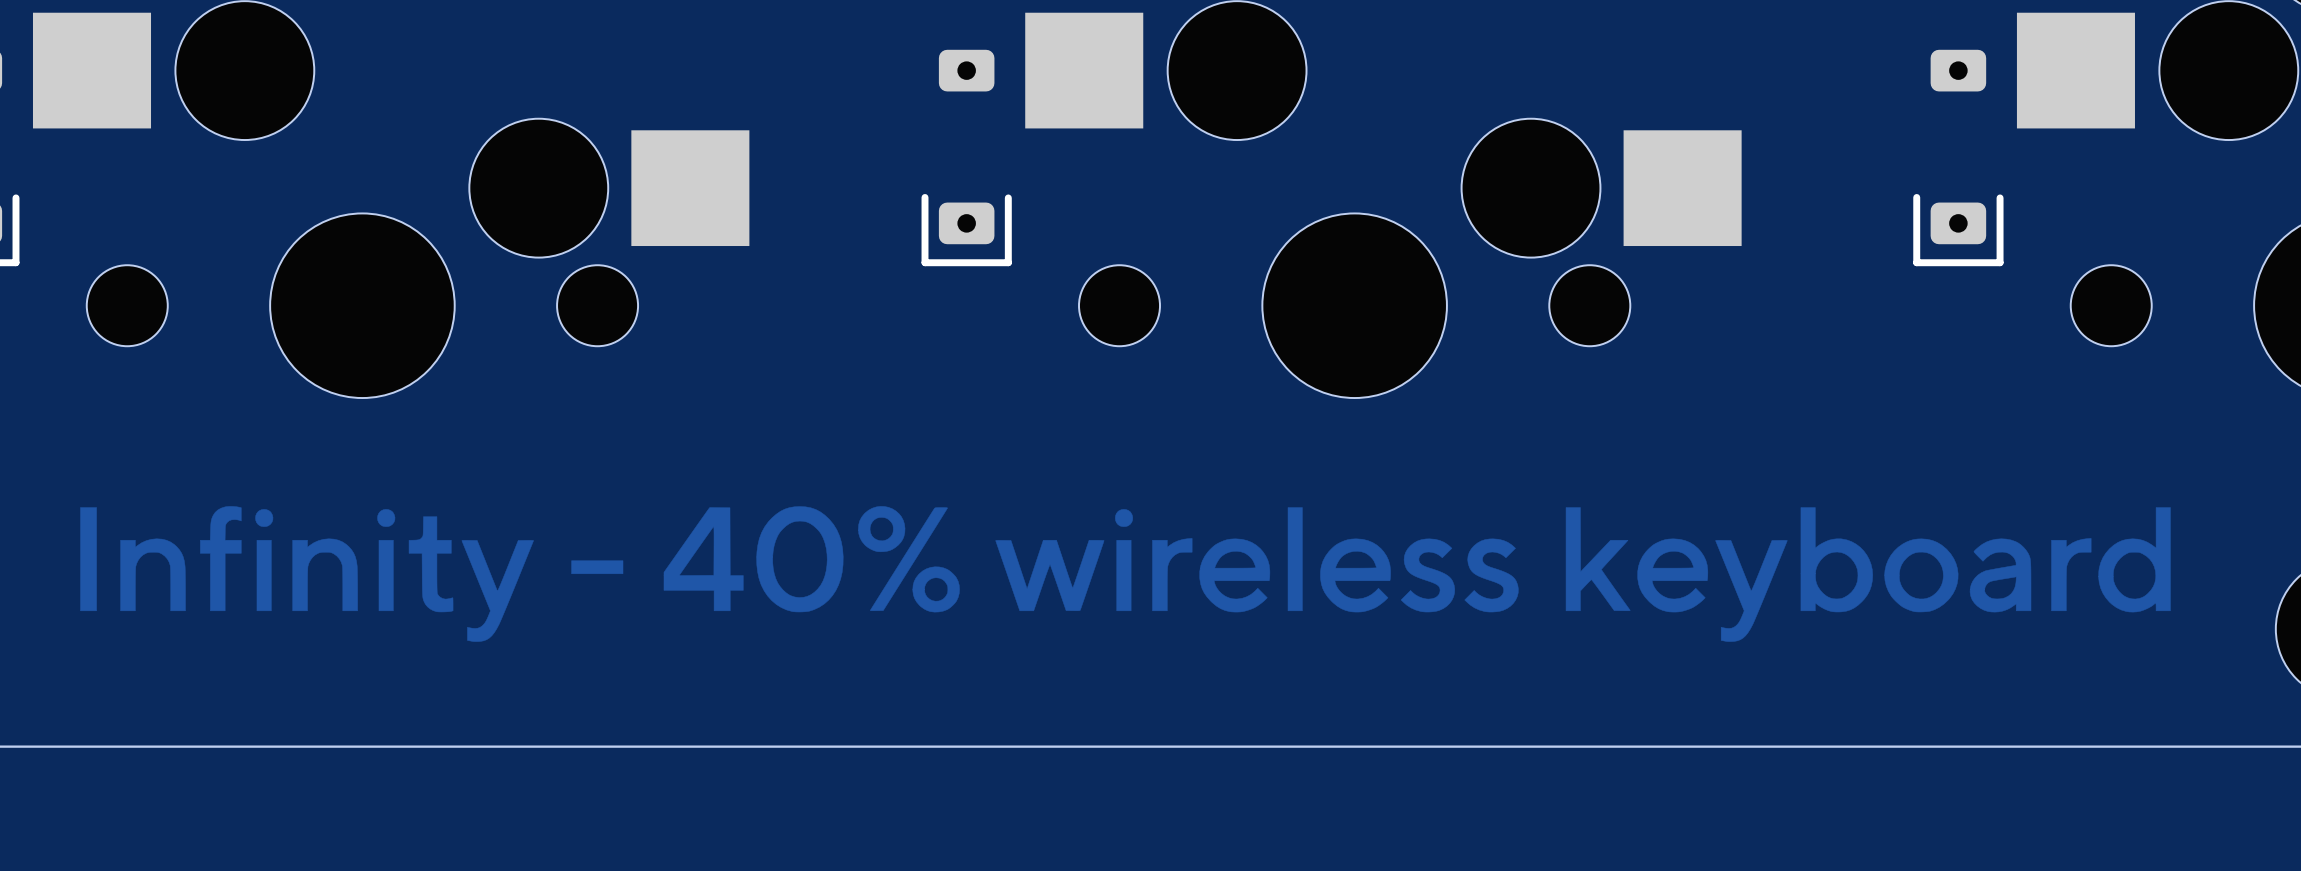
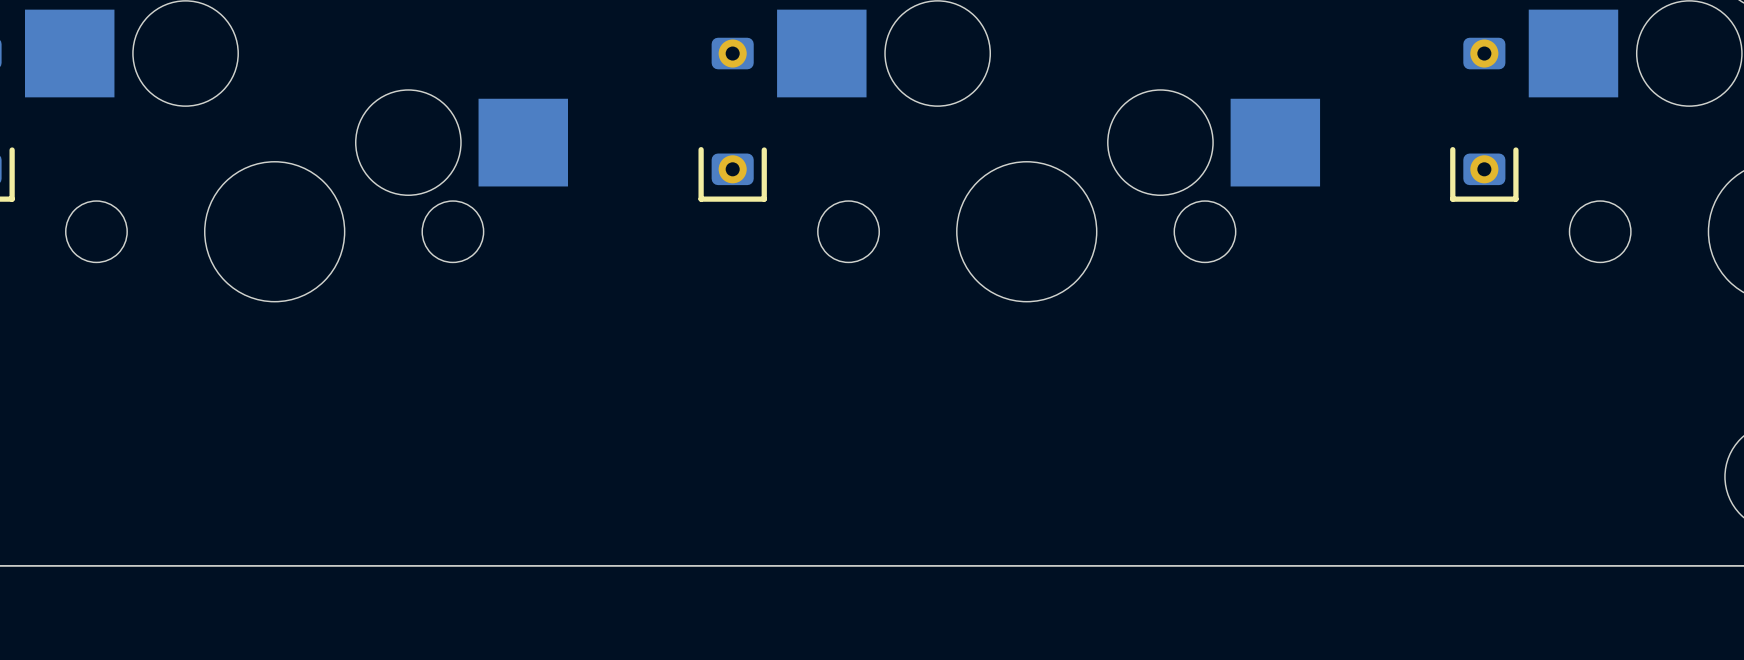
drawing: [80, 506, 2171, 642] -> none

